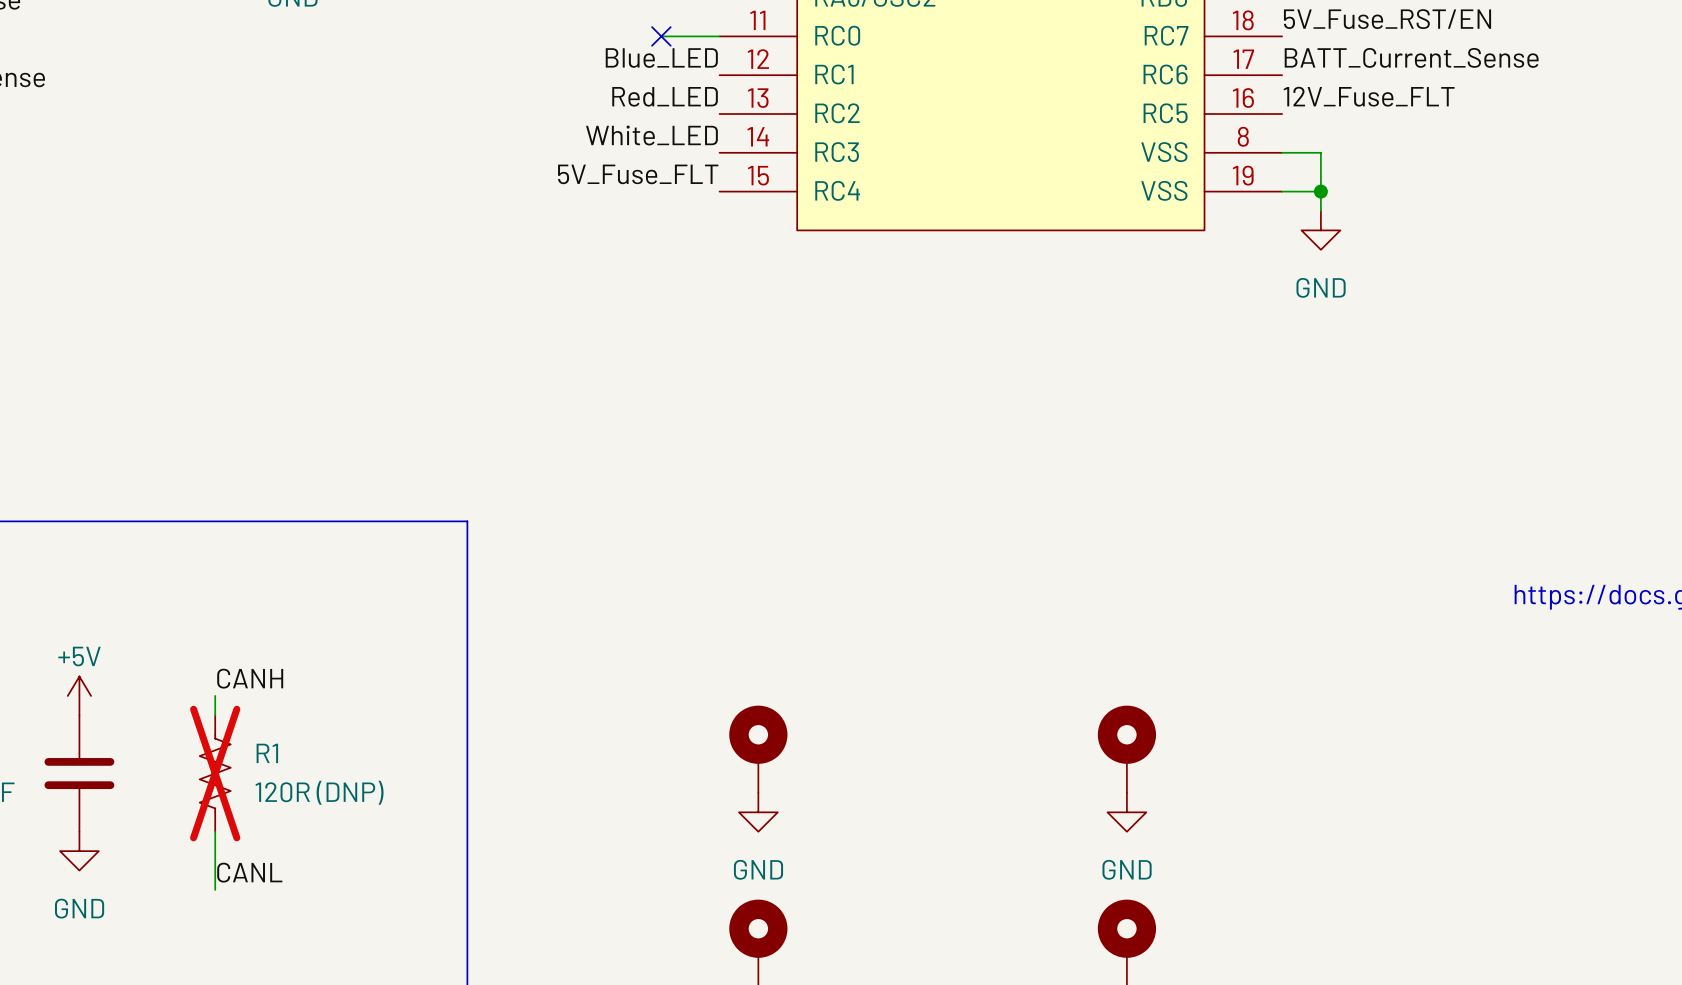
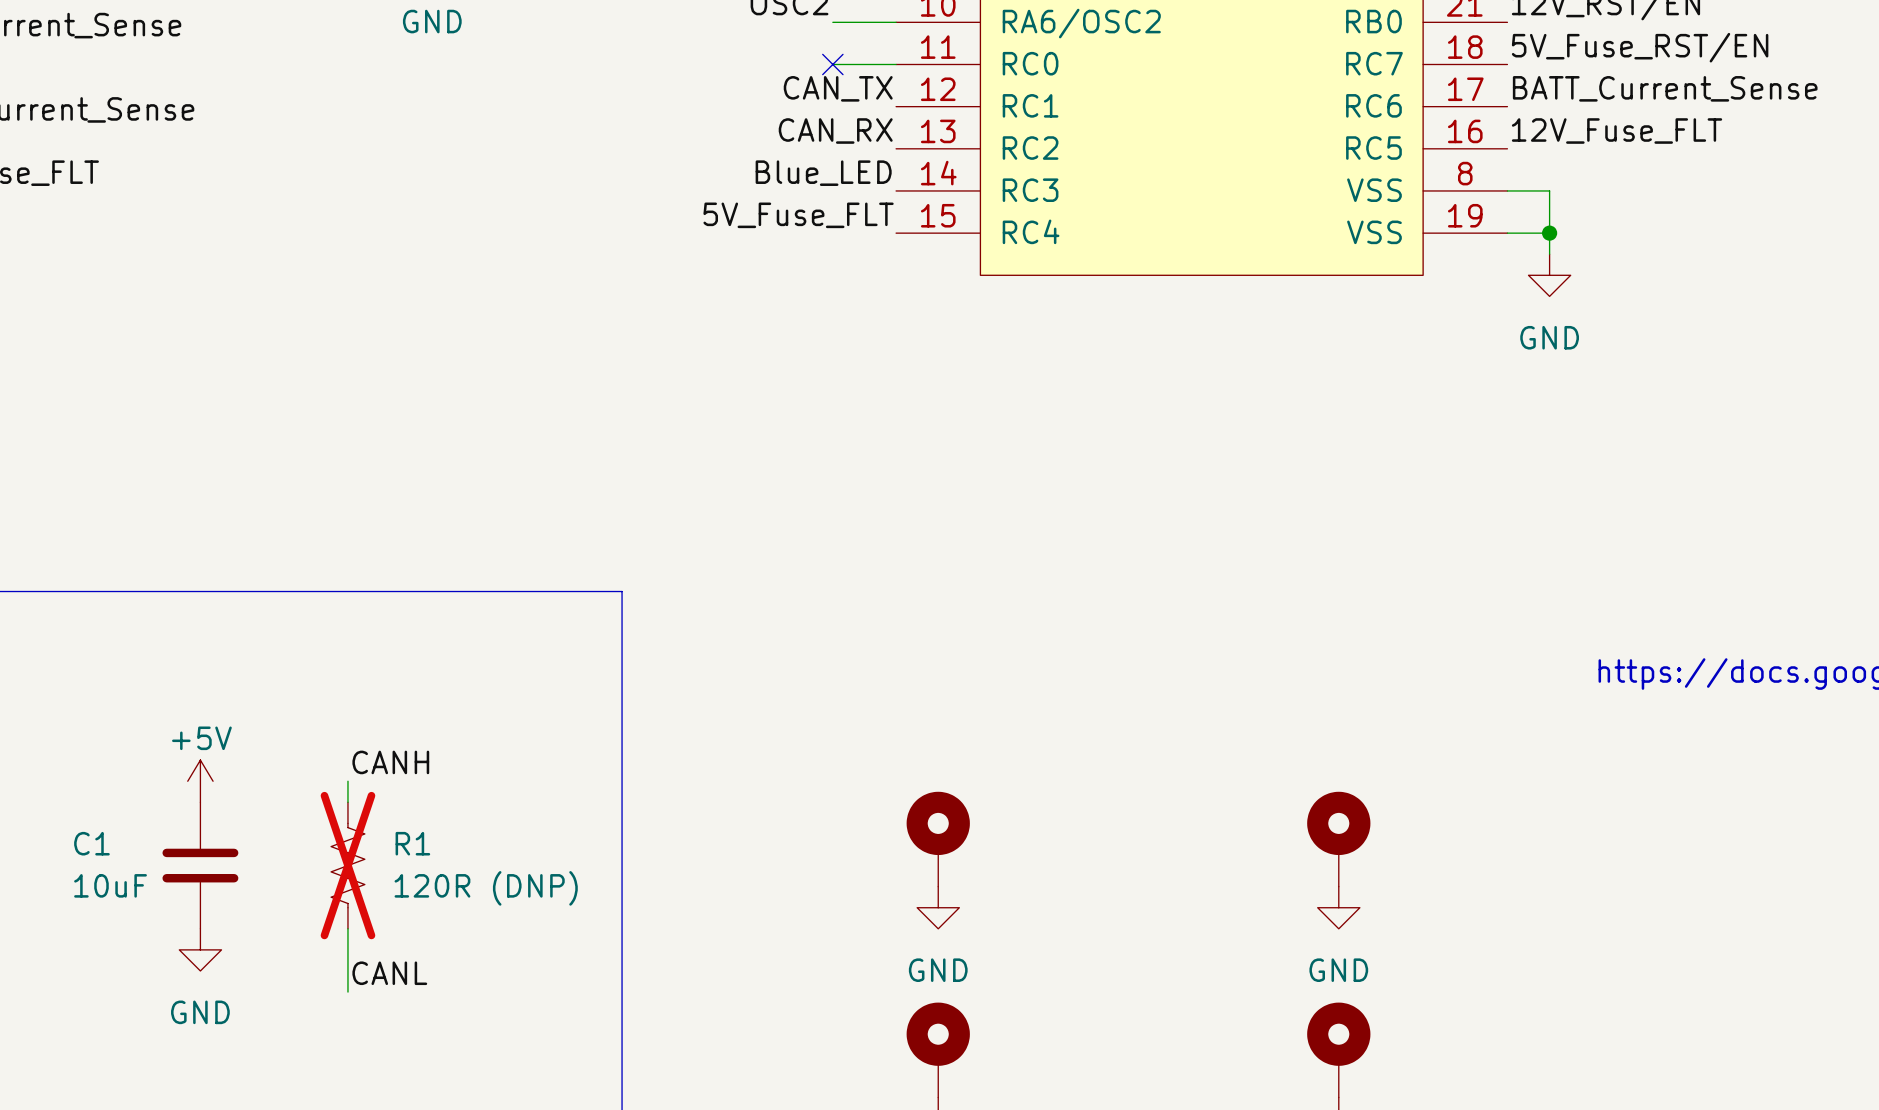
label: Blue_LED (661, 58) -> CAN_TX (838, 88)
label: Red_LED (665, 96) -> CAN_RX (835, 131)
label: White_LED (651, 135) -> Blue_LED (823, 173)

